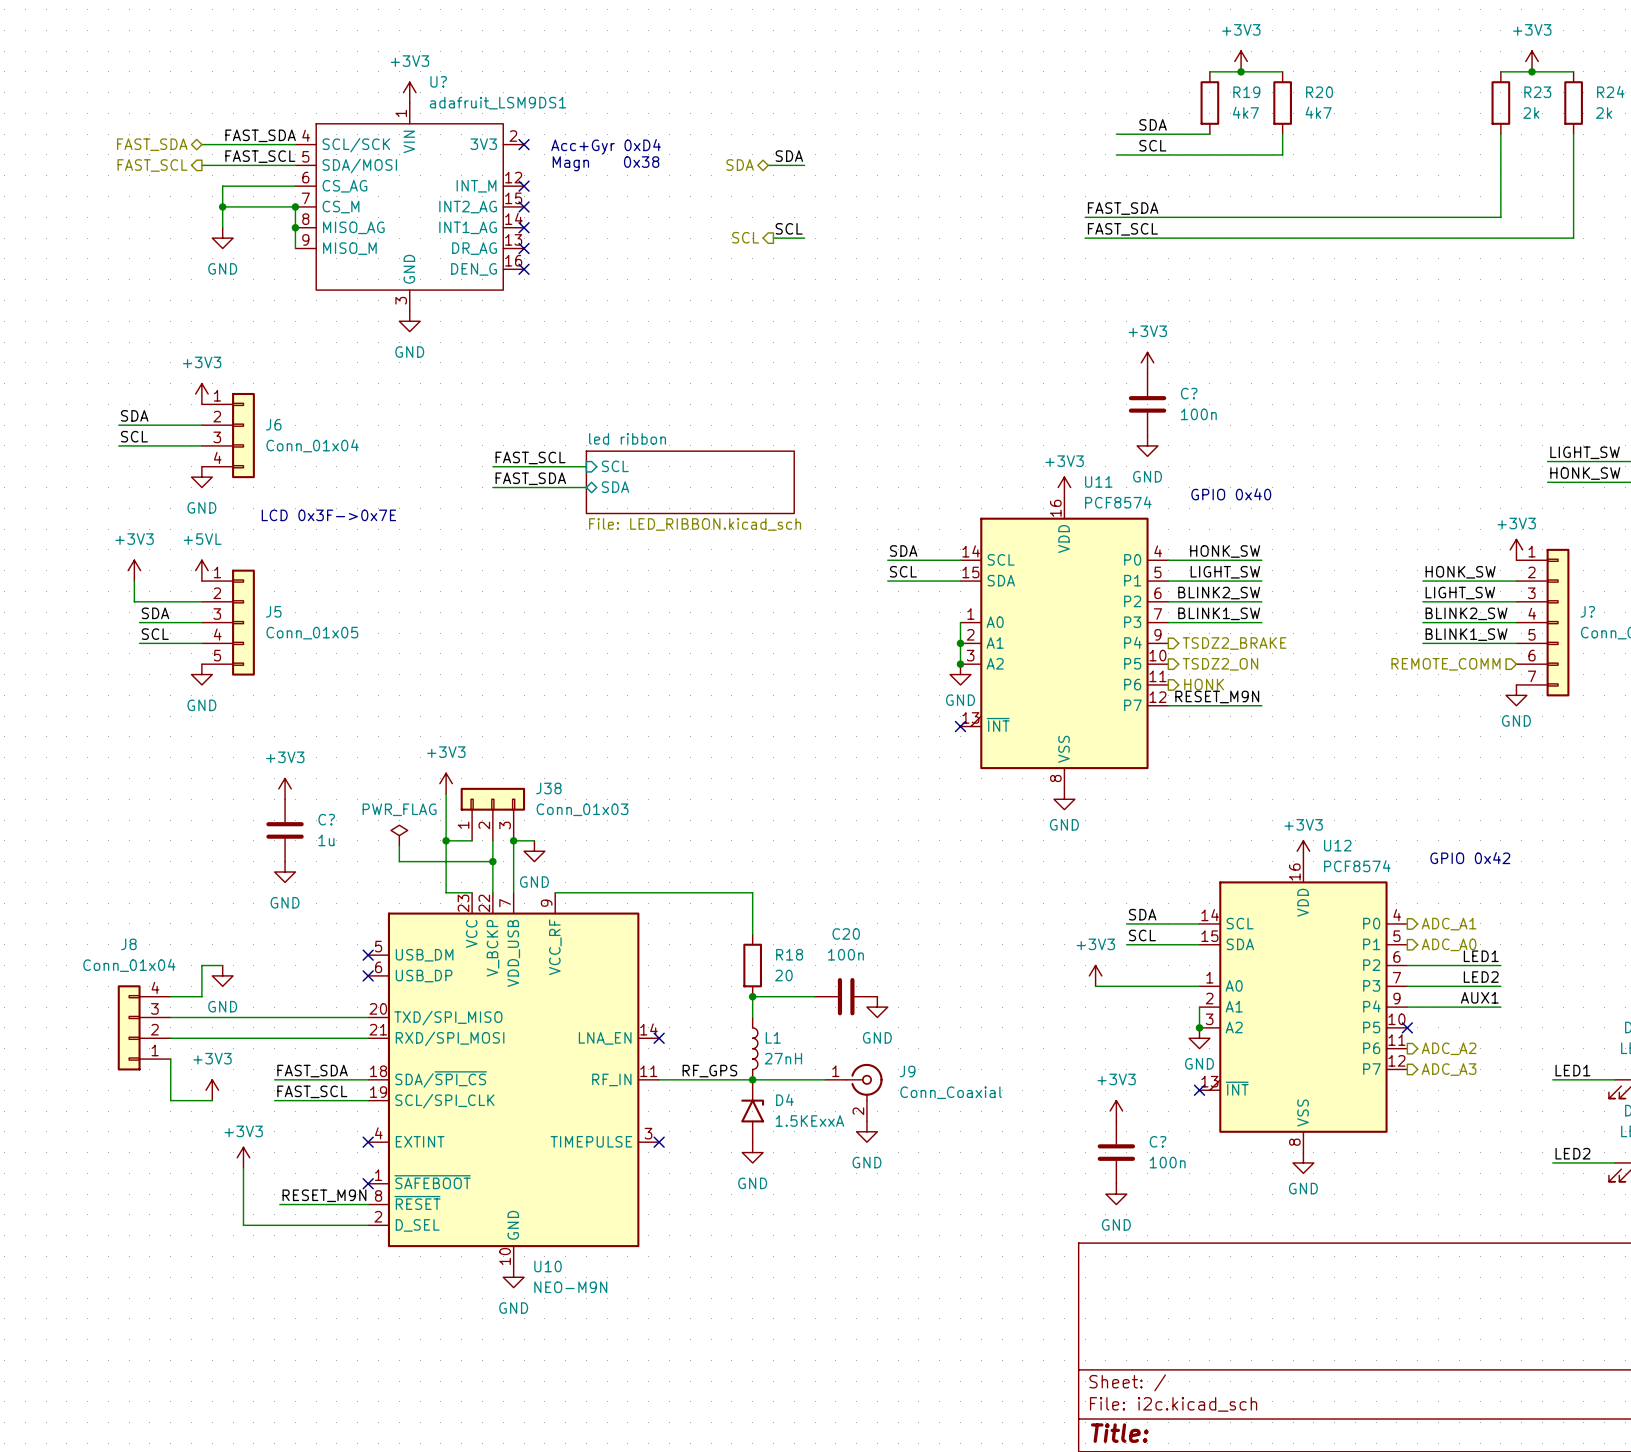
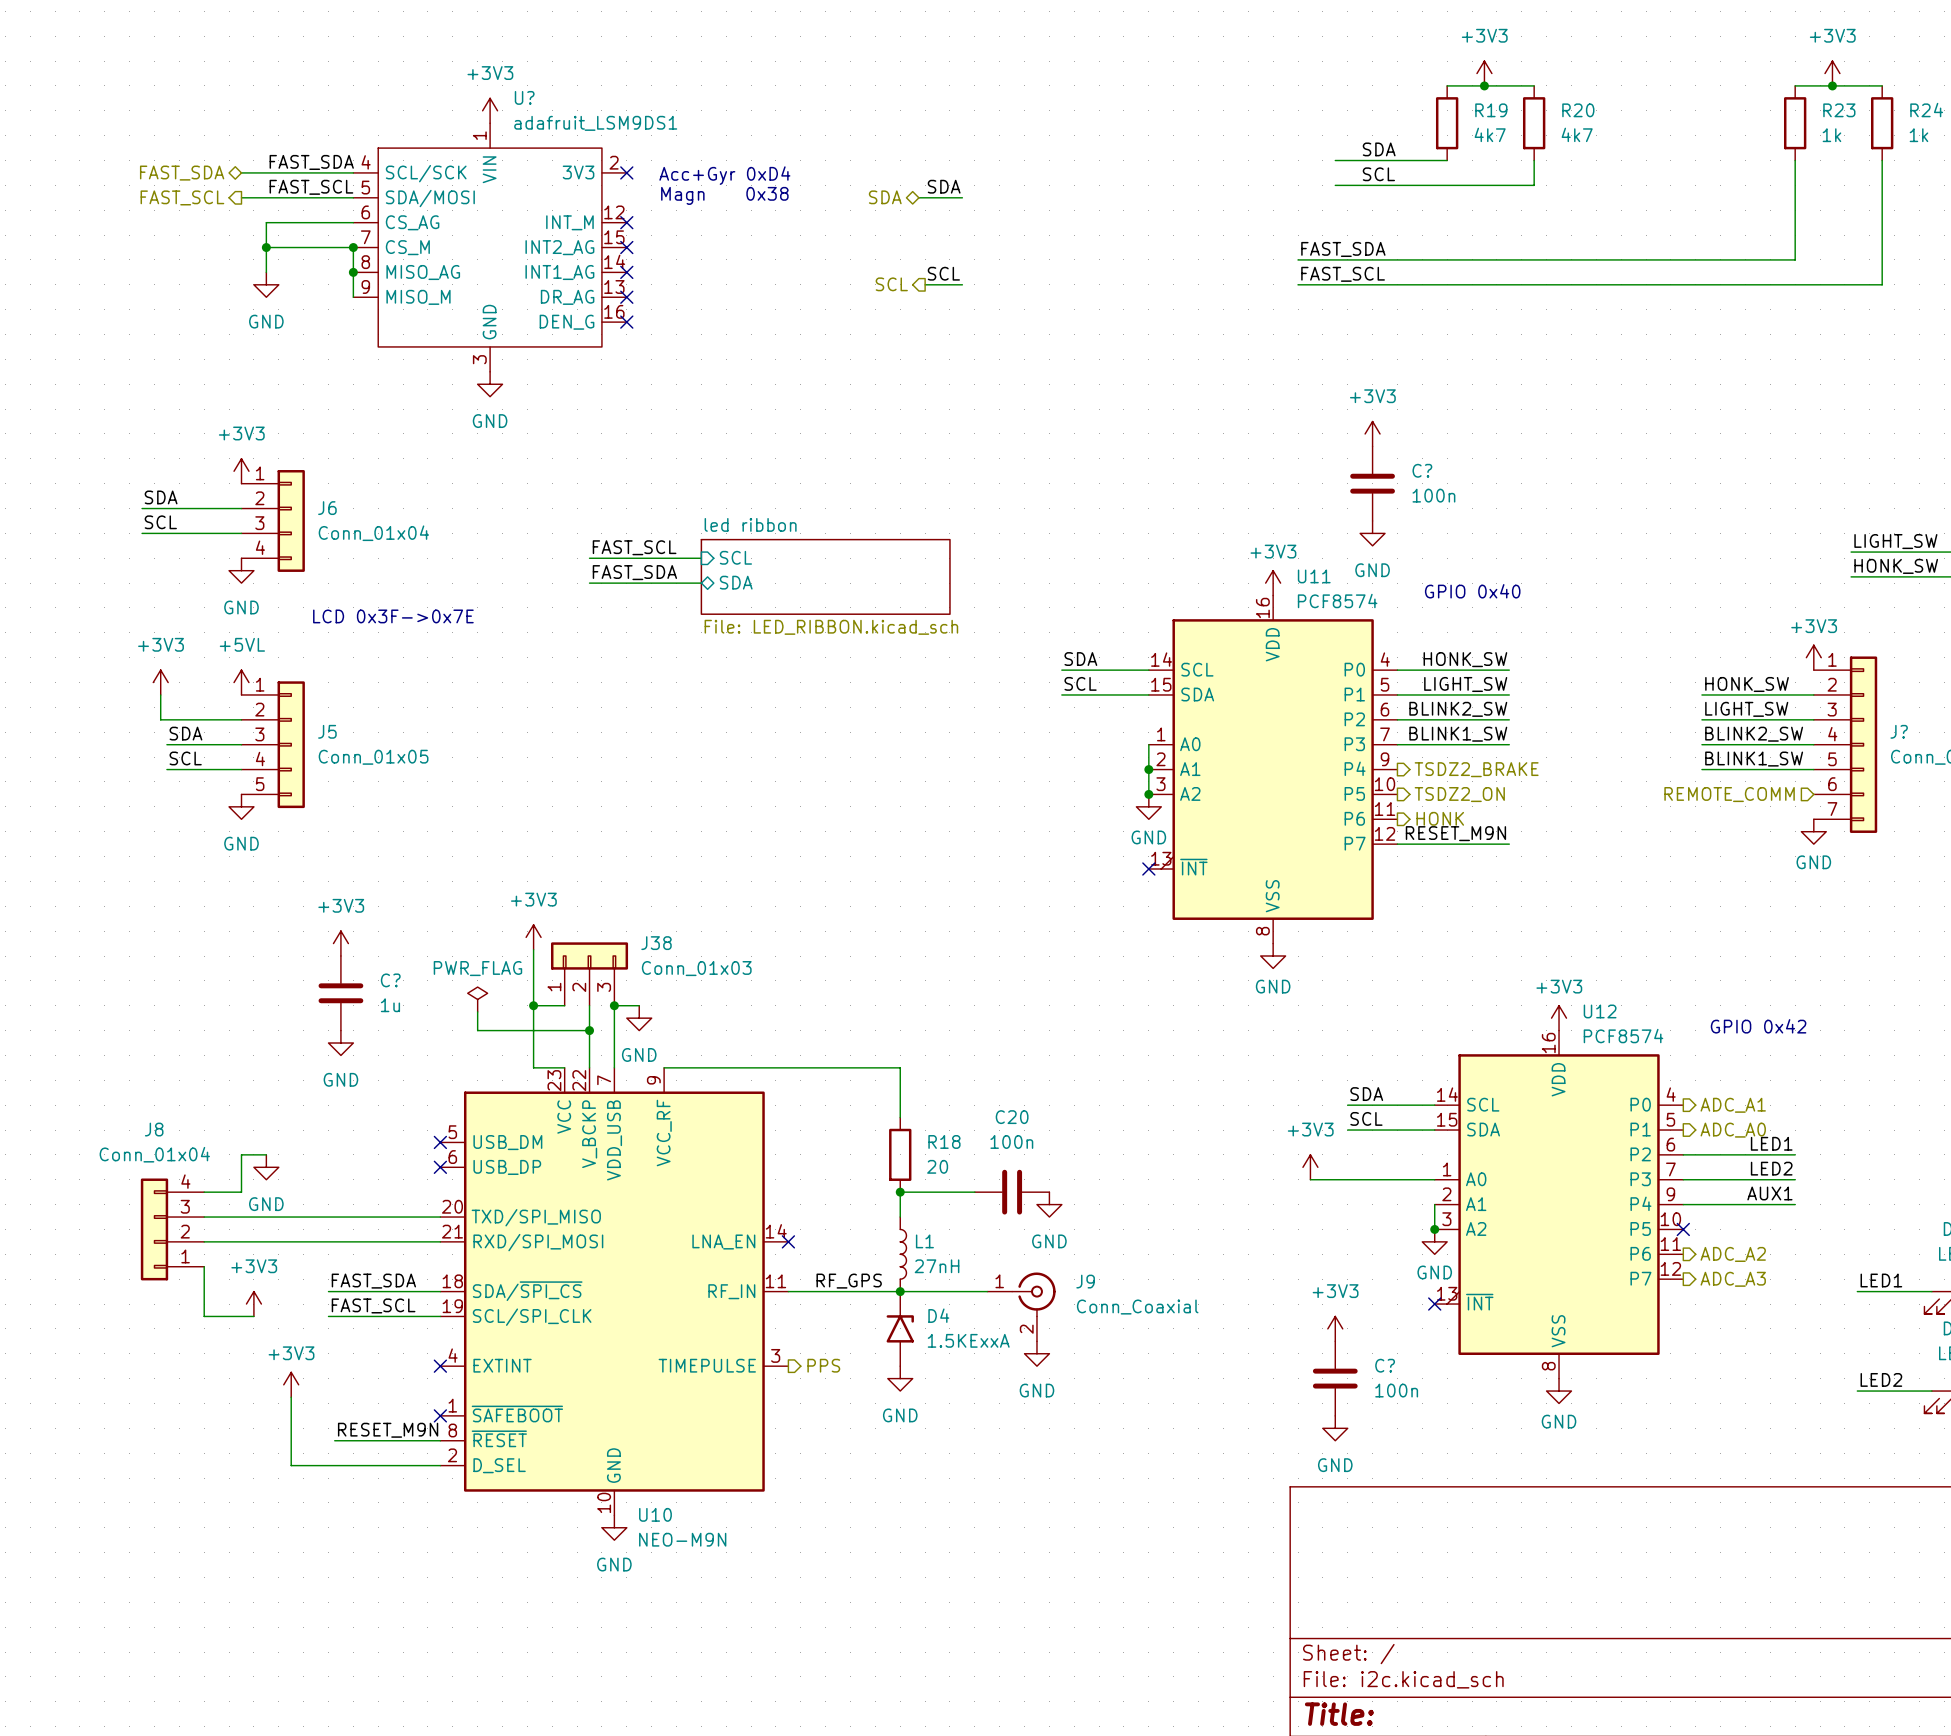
R23 value: 2k (1531, 113) -> 1k (1831, 135)
R24 value: 2k (1604, 113) -> 1k (1918, 135)
hierarchical label: none -> PPS (823, 1365)
no-connect mark: (659, 1142) -> none

